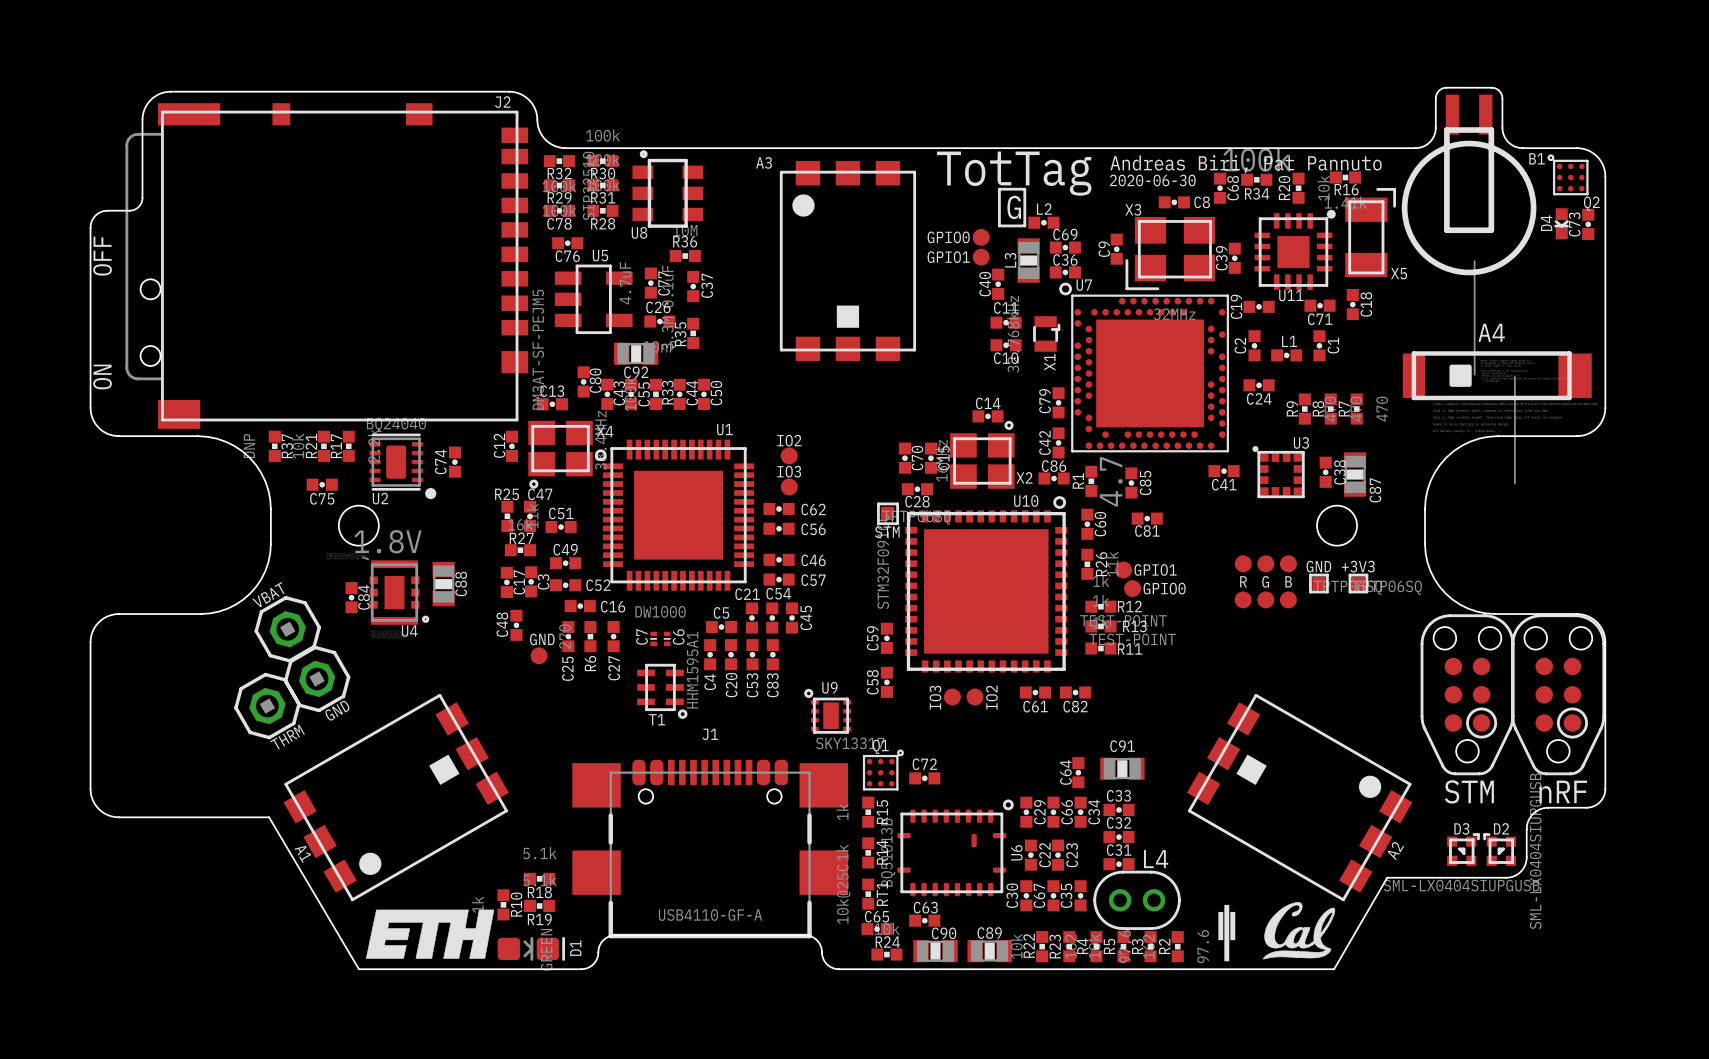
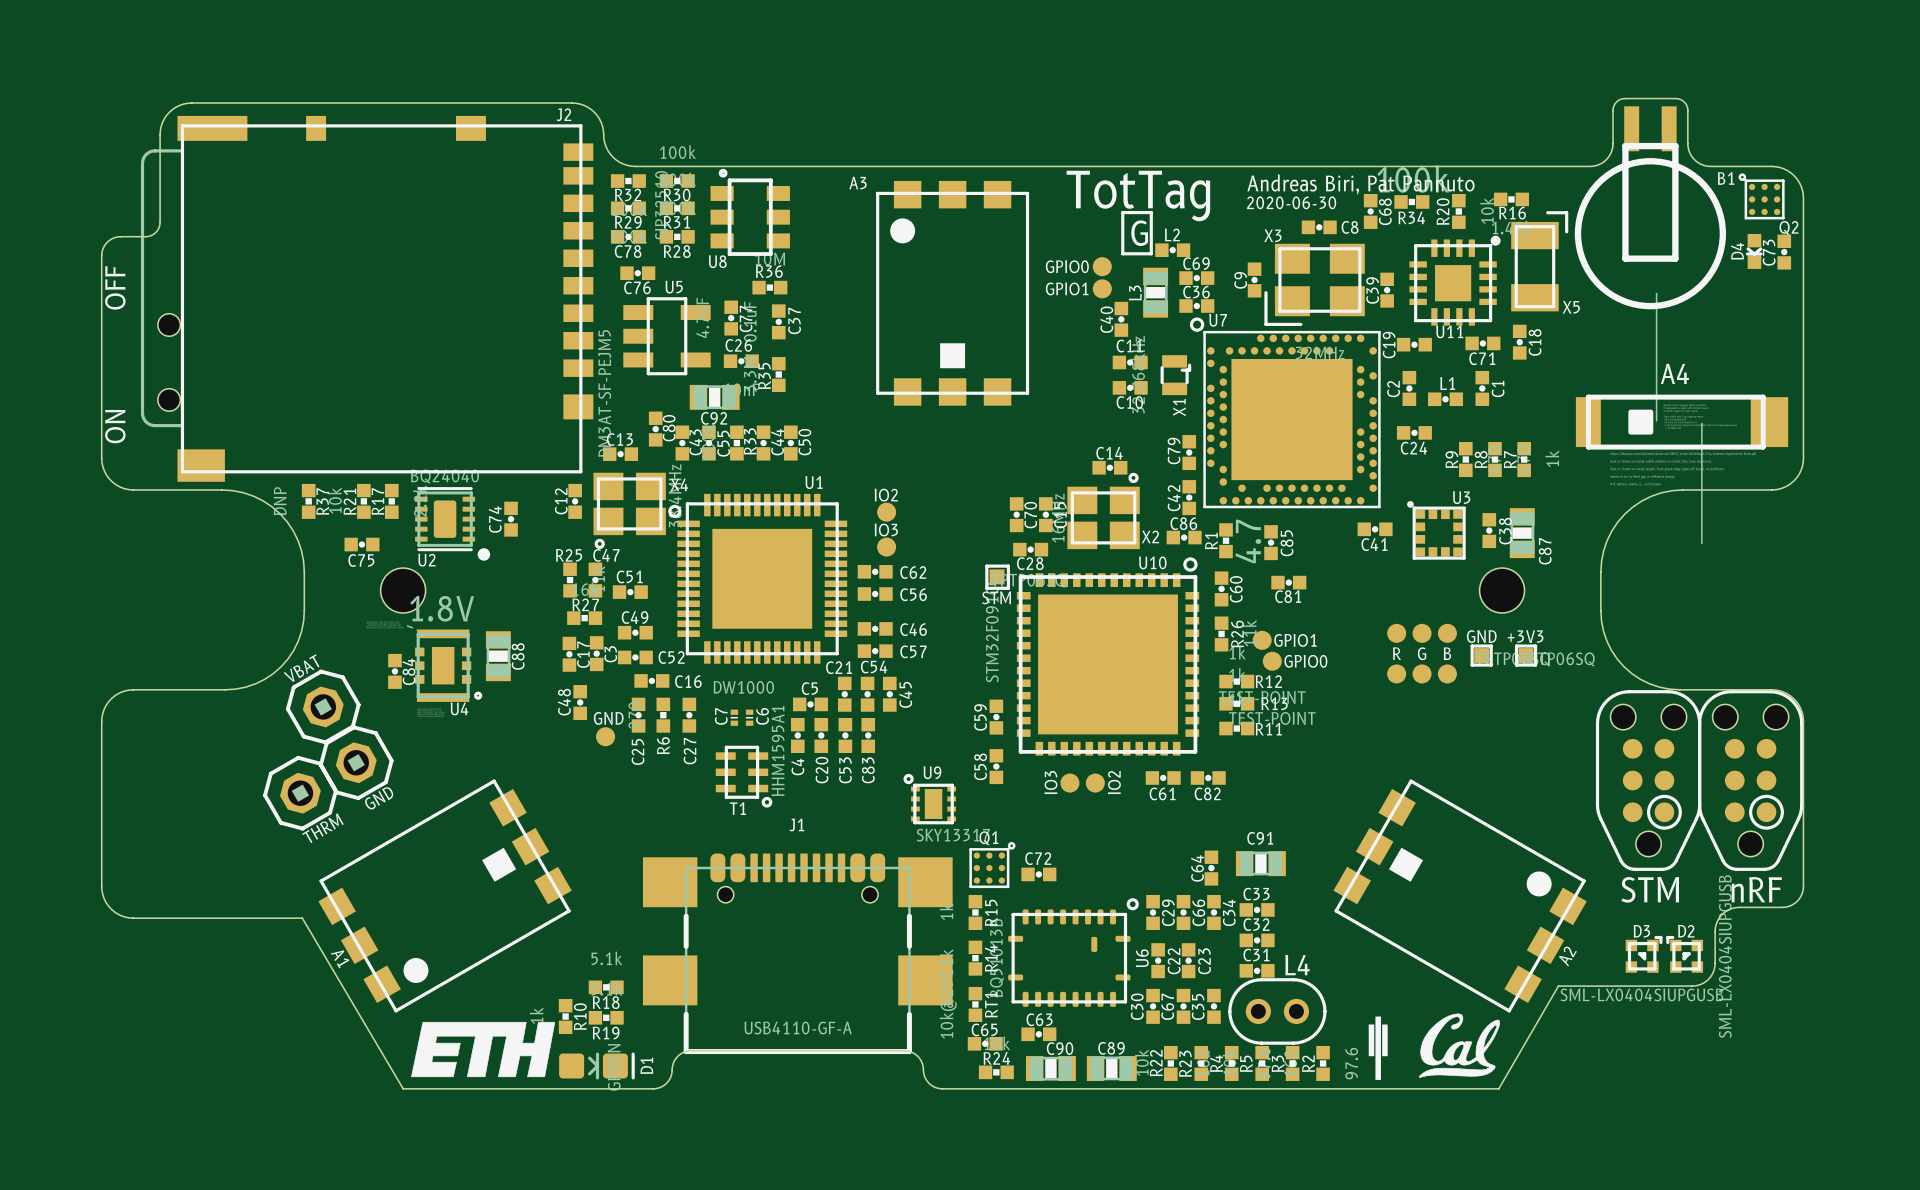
R7 value: 470 (1382, 409) -> 1k (1552, 458)

